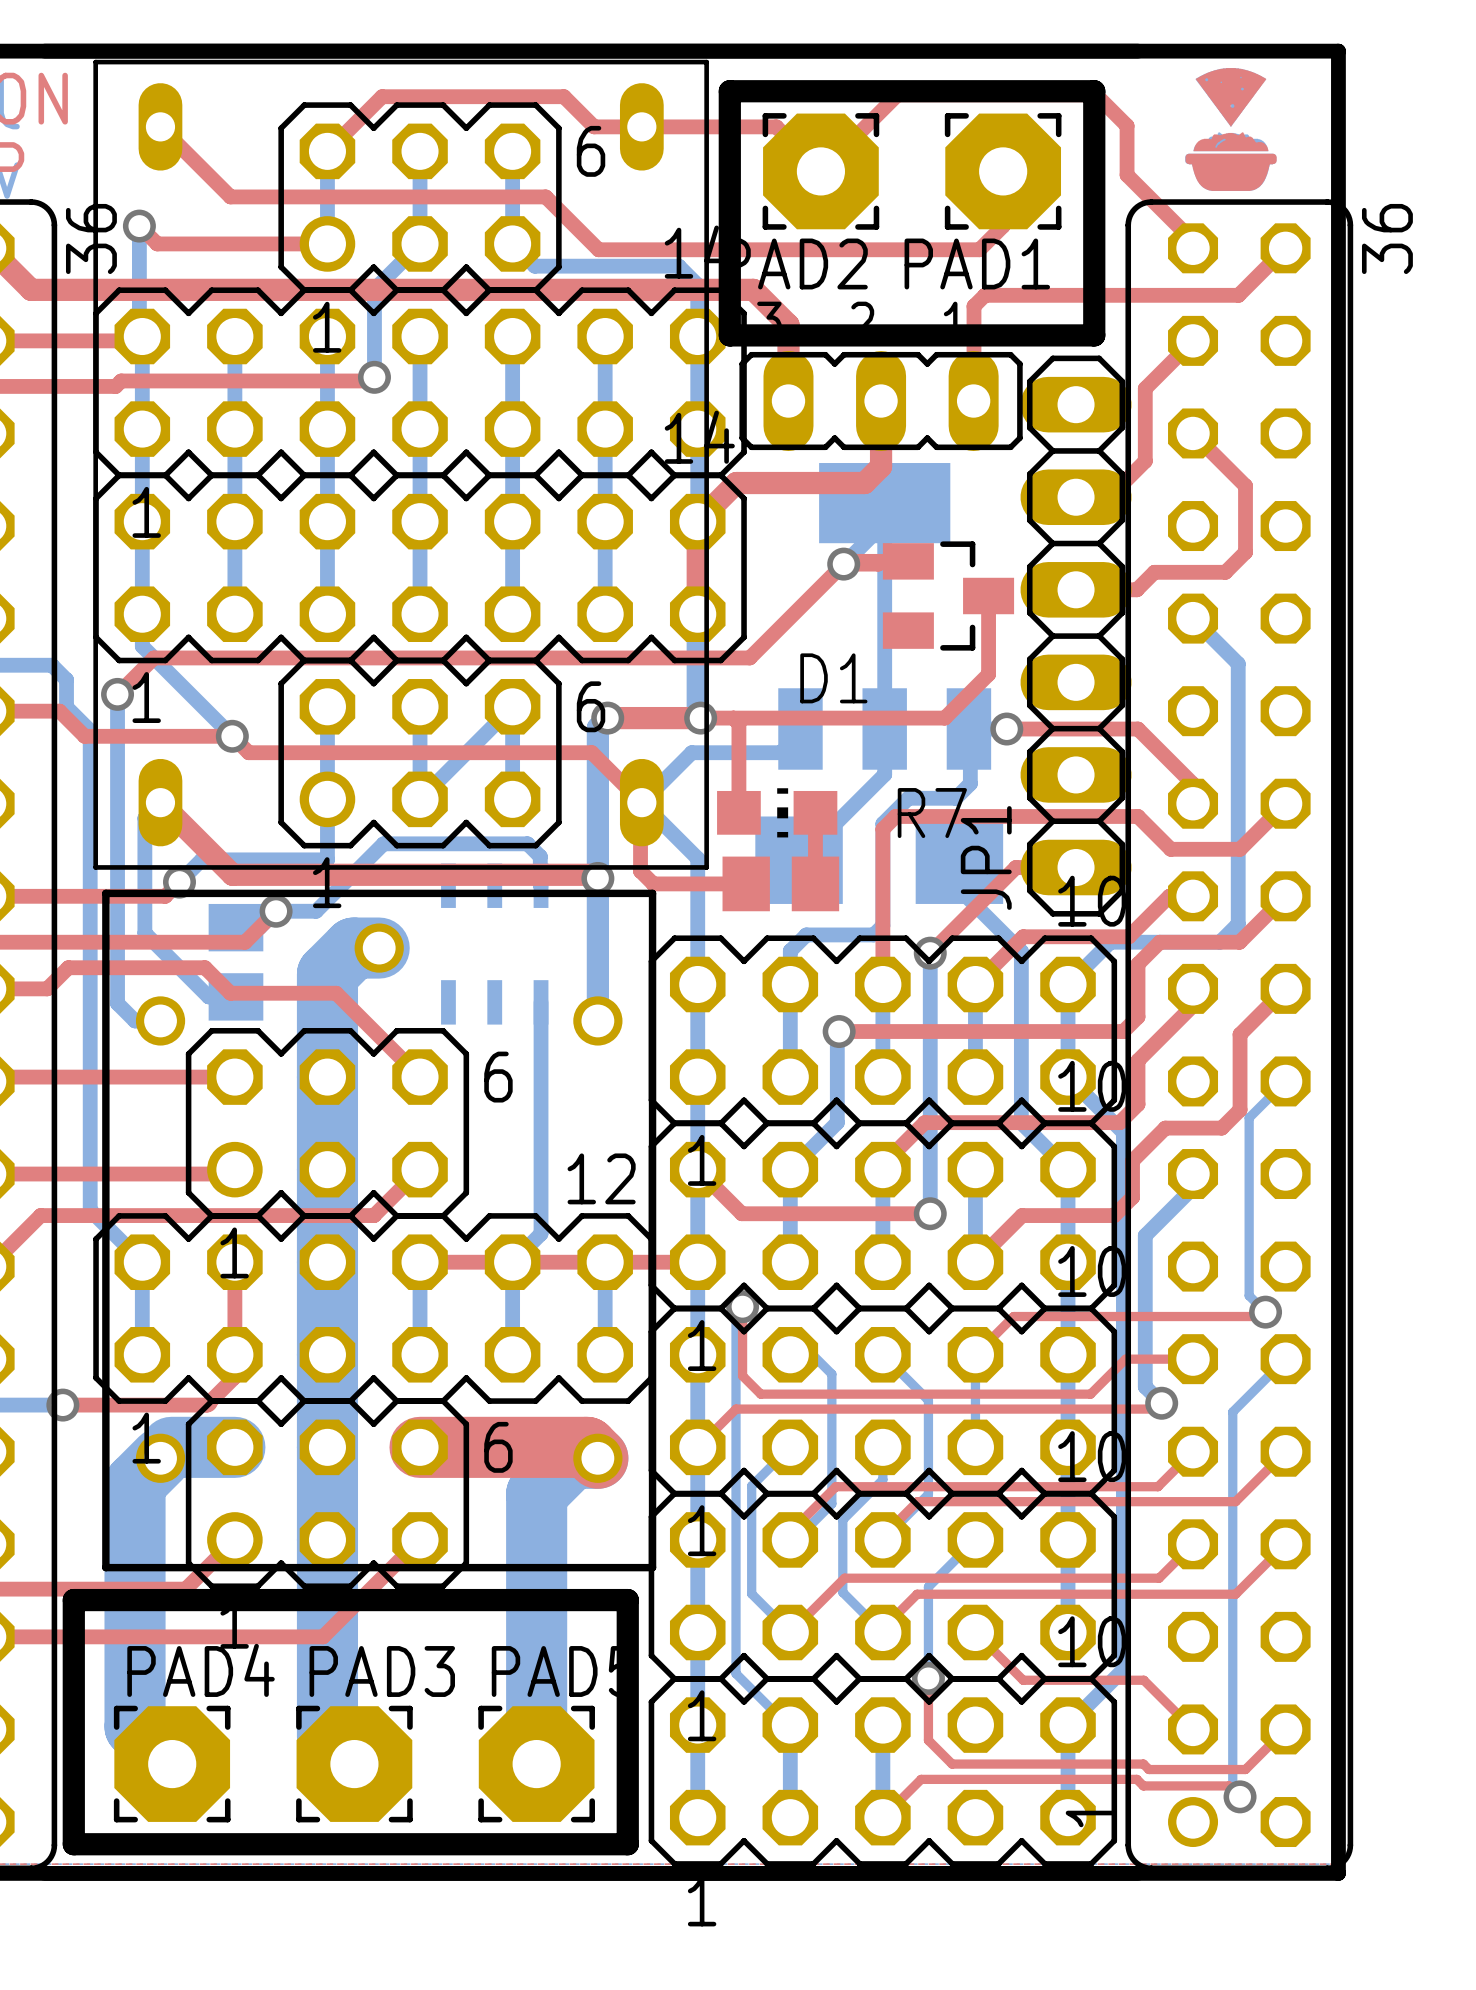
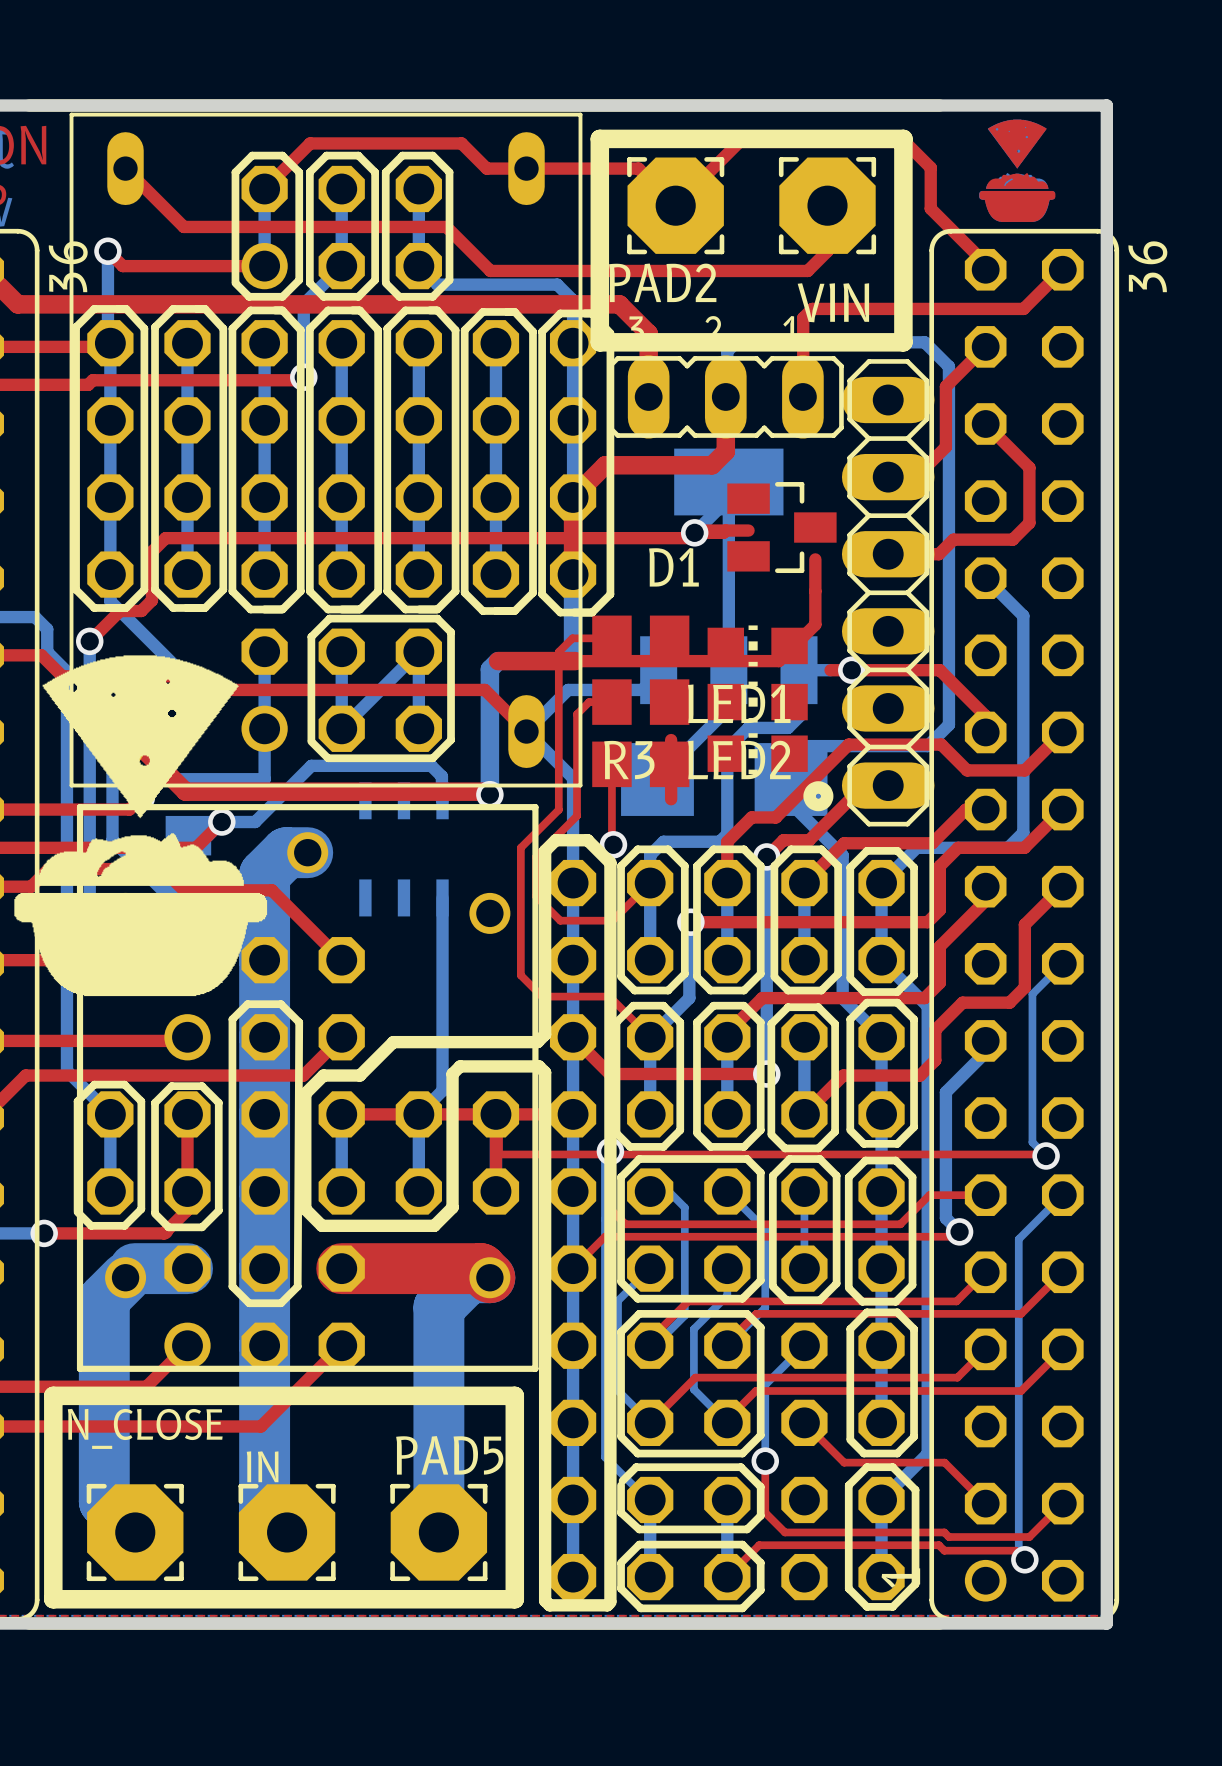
part footprint: [278, 102, 562, 294] -> [241, 165, 442, 290]
line: none -> (326, 155) (309, 172) (309, 283) (323, 296) (358, 296) (375, 280) (375, 172) (358, 155) (326, 155)
line: none -> (235, 281) (235, 172) (252, 155) (282, 155) (299, 172) (299, 280) (282, 296) (249, 296) (235, 283)
line: none -> (385, 281) (385, 172) (402, 155) (432, 155) (449, 172) (449, 280) (432, 296) (399, 296) (385, 283)
PAD1 name: PAD1 (977, 263) -> VIN (833, 302)
part footprint: [93, 287, 747, 479] -> [87, 320, 597, 444]
line: none -> (94, 308) (126, 308) (144, 328) (144, 589) (126, 607) (94, 607) (76, 589) (76, 327) (94, 308)
line: none -> (173, 308) (205, 308) (223, 328) (223, 589) (205, 607) (173, 607) (155, 589) (155, 327) (173, 308)
line: none -> (250, 310) (282, 310) (300, 330) (300, 591) (282, 609) (250, 609) (232, 591) (232, 328) (250, 310)
line: none -> (328, 310) (359, 310) (378, 330) (378, 591) (359, 609) (328, 609) (309, 591) (309, 328) (328, 310)
line: none -> (405, 310) (437, 310) (455, 330) (455, 591) (437, 609) (405, 609) (387, 591) (387, 328) (405, 310)
line: none -> (482, 311) (514, 311) (533, 331) (533, 592) (514, 611) (482, 611) (464, 592) (464, 330) (482, 311)
line: none -> (560, 313) (592, 313) (610, 333) (610, 594) (592, 612) (560, 612) (542, 594) (542, 331) (560, 313)
bottom track: none -> (725, 396) (727, 351) (736, 342) (924, 342) (948, 366) (948, 724) (927, 746) (806, 746) (801, 750)
part footprint: [93, 472, 747, 664] -> [87, 474, 597, 598]
top track: (837, 570) (749, 657) (179, 657) -> (689, 538) (165, 538) (151, 551) (151, 600) (141, 611)
D1 position: (948, 596) -> (781, 527)
part footprint: [278, 657, 562, 849] -> [241, 628, 442, 752]
D1 name position: D1 (833, 678) -> D1 (673, 567)
top track: none -> (611, 638) (572, 638) (558, 652) (558, 809) (520, 847) (520, 975) (542, 996) (609, 996) (650, 1037)
part: none -> (640, 638)
LED1: none -> (757, 645)
drawing: none -> [14, 655, 268, 997]
via: (607, 718) -> none
via: (700, 718) -> none
top track: (733, 718) (738, 723) (738, 812) -> none
via position: (1006, 729) -> (851, 670)
top track: none -> (611, 702) (589, 702) (577, 714) (577, 815) (536, 856) (536, 896) (560, 920) (612, 920) (650, 883)
R3: none -> (640, 702)
LED2: none -> (757, 702)
top track: (640, 803) (640, 871) (653, 883) (746, 883) -> none
line: none -> (311, 740) (311, 636) (329, 618) (437, 618) (451, 632) (451, 740) (432, 758) (328, 758) (311, 741)
part rotation: 0° (777, 812) -> 180° (757, 753)
part position: (777, 812) -> (757, 753)
top track: (1139, 818) (1138, 816) (895, 816) (882, 829) (882, 934) -> (941, 744) (848, 744) (775, 817) (751, 817) (727, 841)
top track: none -> (611, 764) (613, 844)
part: none -> (640, 764)
JP1 name: JP1 (986, 857) -> none
drawing: none -> [803, 781, 834, 812]
top track: (1046, 867) (1015, 867) (950, 933) -> (863, 785) (809, 840) (783, 840)
bottom track: (597, 878) (597, 1020) -> none
R7: (780, 883) -> none
part footprint: [648, 935, 1118, 1127] -> [549, 859, 905, 984]
via: none -> (613, 844)
part footprint: [185, 1028, 470, 1219] -> [164, 937, 365, 1061]
line: none -> (621, 975) (621, 866) (637, 849) (668, 849) (684, 866) (684, 973) (668, 990) (634, 990) (621, 976)
line: none -> (696, 975) (696, 866) (713, 849) (744, 849) (760, 866) (760, 973) (744, 990) (710, 990) (696, 976)
line: none -> (774, 975) (774, 866) (791, 849) (821, 849) (838, 866) (838, 973) (821, 990) (788, 990) (774, 976)
line: none -> (850, 976) (850, 867) (866, 850) (897, 850) (914, 867) (914, 975) (897, 992) (863, 992) (850, 978)
part footprint: [648, 1120, 1118, 1312] -> [549, 1014, 905, 1138]
line: none -> (247, 1004) (281, 1004) (299, 1022) (297, 1286) (281, 1303) (249, 1303) (232, 1286) (232, 1019) (247, 1004)
part footprint: [93, 1213, 655, 1404] -> [87, 1091, 520, 1215]
line: none -> (850, 1128) (850, 1019) (866, 1002) (897, 1002) (914, 1019) (914, 1127) (897, 1143) (863, 1143) (850, 1130)
line: none -> (616, 1131) (616, 1022) (633, 1005) (663, 1005) (680, 1022) (680, 1130) (663, 1146) (630, 1146) (616, 1133)
line: none -> (696, 1131) (696, 1022) (713, 1005) (744, 1005) (760, 1022) (760, 1130) (744, 1146) (710, 1146) (696, 1133)
line: none -> (771, 1133) (771, 1023) (788, 1007) (818, 1007) (835, 1023) (835, 1131) (818, 1148) (785, 1148) (771, 1134)
part footprint: [648, 1305, 1118, 1497] -> [549, 1168, 905, 1292]
top track: (1265, 1312) (1260, 1316) (1013, 1316) (975, 1354) -> (1046, 1155) (1044, 1154) (499, 1154) (496, 1151) (495, 1114) (495, 1191)
line: none -> (77, 1210) (77, 1101) (94, 1084) (124, 1084) (141, 1101) (141, 1209) (124, 1225) (91, 1225) (77, 1212)
line: none -> (155, 1212) (155, 1102) (171, 1086) (202, 1086) (218, 1102) (218, 1210) (202, 1227) (168, 1227) (155, 1213)
part footprint: [185, 1398, 470, 1589] -> [164, 1245, 365, 1369]
line: none -> (621, 1280) (621, 1177) (639, 1159) (747, 1159) (760, 1172) (760, 1280) (742, 1298) (637, 1298) (621, 1281)
line: none -> (772, 1285) (772, 1175) (789, 1159) (819, 1159) (836, 1175) (836, 1283) (819, 1300) (786, 1300) (772, 1286)
line: none -> (848, 1286) (848, 1177) (865, 1160) (895, 1160) (912, 1177) (912, 1285) (895, 1301) (862, 1301) (848, 1288)
part footprint: [648, 1490, 1118, 1682] -> [549, 1322, 905, 1447]
line: none -> (621, 1435) (621, 1332) (639, 1313) (747, 1313) (760, 1327) (760, 1435) (742, 1453) (637, 1453) (621, 1436)
line: none -> (850, 1438) (850, 1329) (866, 1312) (897, 1312) (914, 1329) (914, 1436) (897, 1453) (863, 1453) (850, 1439)
PAD4 name: PAD4 (201, 1670) -> N_CLOSE (145, 1428)
PAD3 name: PAD3 (382, 1671) -> IN (262, 1466)
part footprint: [648, 1676, 1118, 1867] -> [549, 1476, 905, 1601]
line: none -> (866, 1467) (892, 1467) (915, 1489) (915, 1584) (892, 1606) (866, 1606) (848, 1588) (848, 1485) (866, 1467)
line: none -> (622, 1480) (636, 1467) (740, 1467) (760, 1486) (760, 1515) (747, 1529) (639, 1529) (621, 1512) (621, 1485)
line: none -> (621, 1562) (639, 1544) (742, 1544) (760, 1562) (760, 1590) (742, 1608) (640, 1608) (621, 1588) (621, 1564)
line: none -> (610, 1600) (610, 863) (587, 840) (555, 840) (545, 850) (545, 1034) (537, 1042) (393, 1042) (359, 1075) (323, 1075) (305, 1093) (305, 1209) (321, 1225) (434, 1225) (452, 1207) (452, 1074) (460, 1066) (539, 1066) (545, 1072) (545, 1600) (549, 1605) (607, 1605) (610, 1602)

